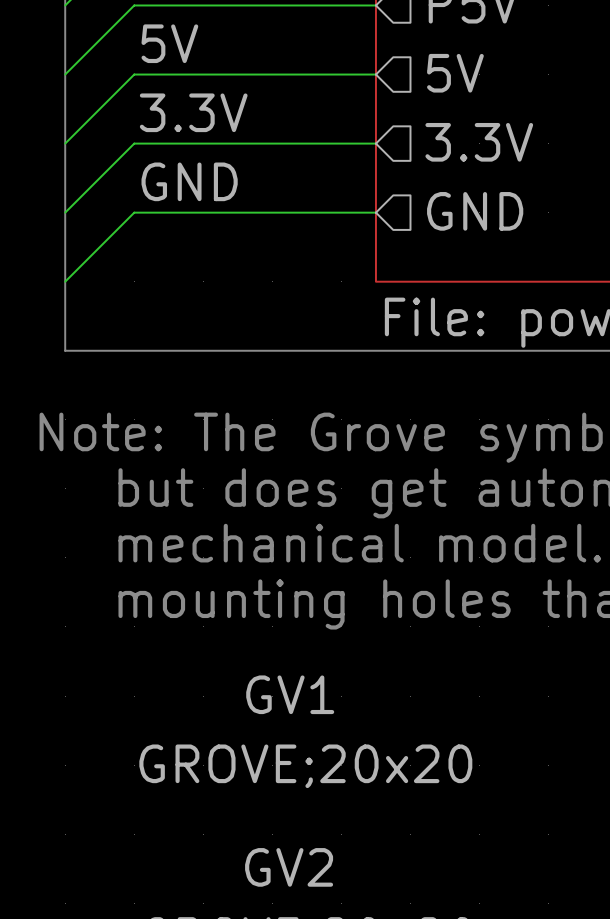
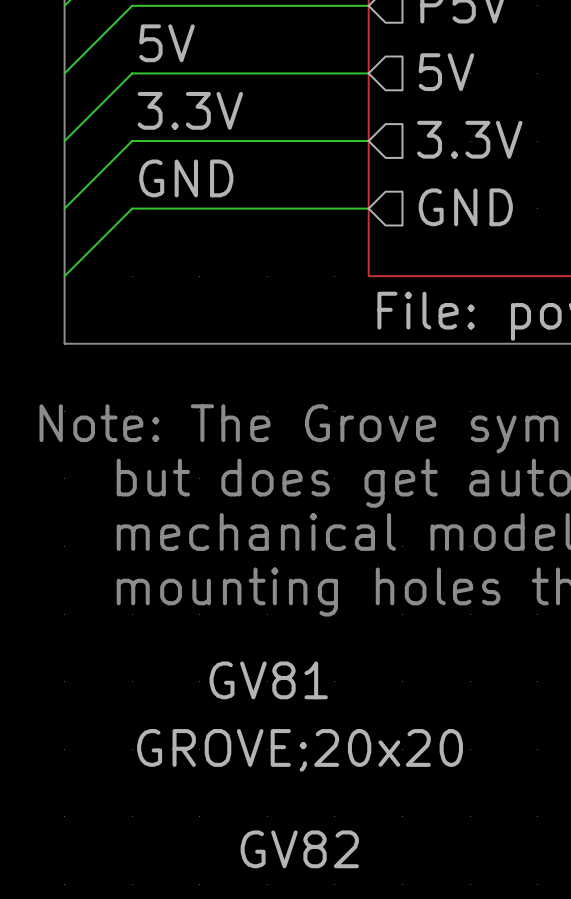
GV1 name: GV1 (290, 694) -> GV81 (268, 680)
GV2 name: GV2 (289, 867) -> GV82 (299, 849)

